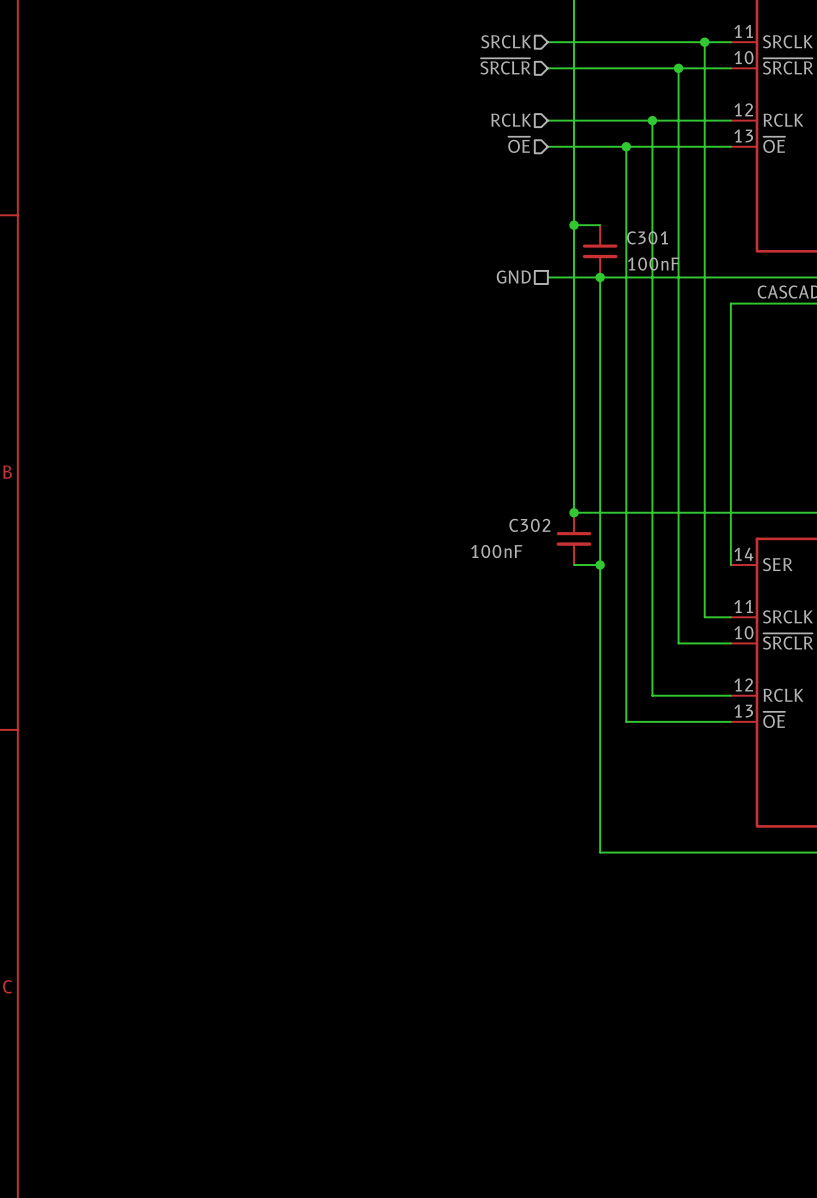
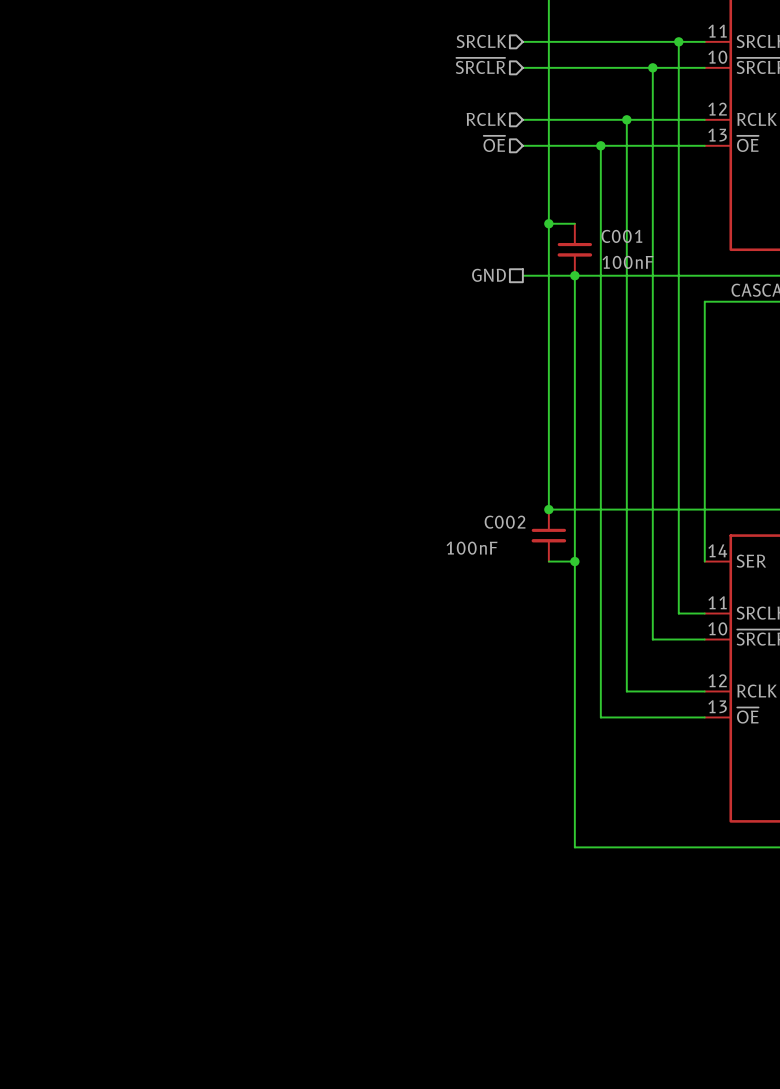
C301 name: C301 (647, 237) -> C001 (621, 236)
C302 name: C302 (529, 525) -> C002 (505, 522)

